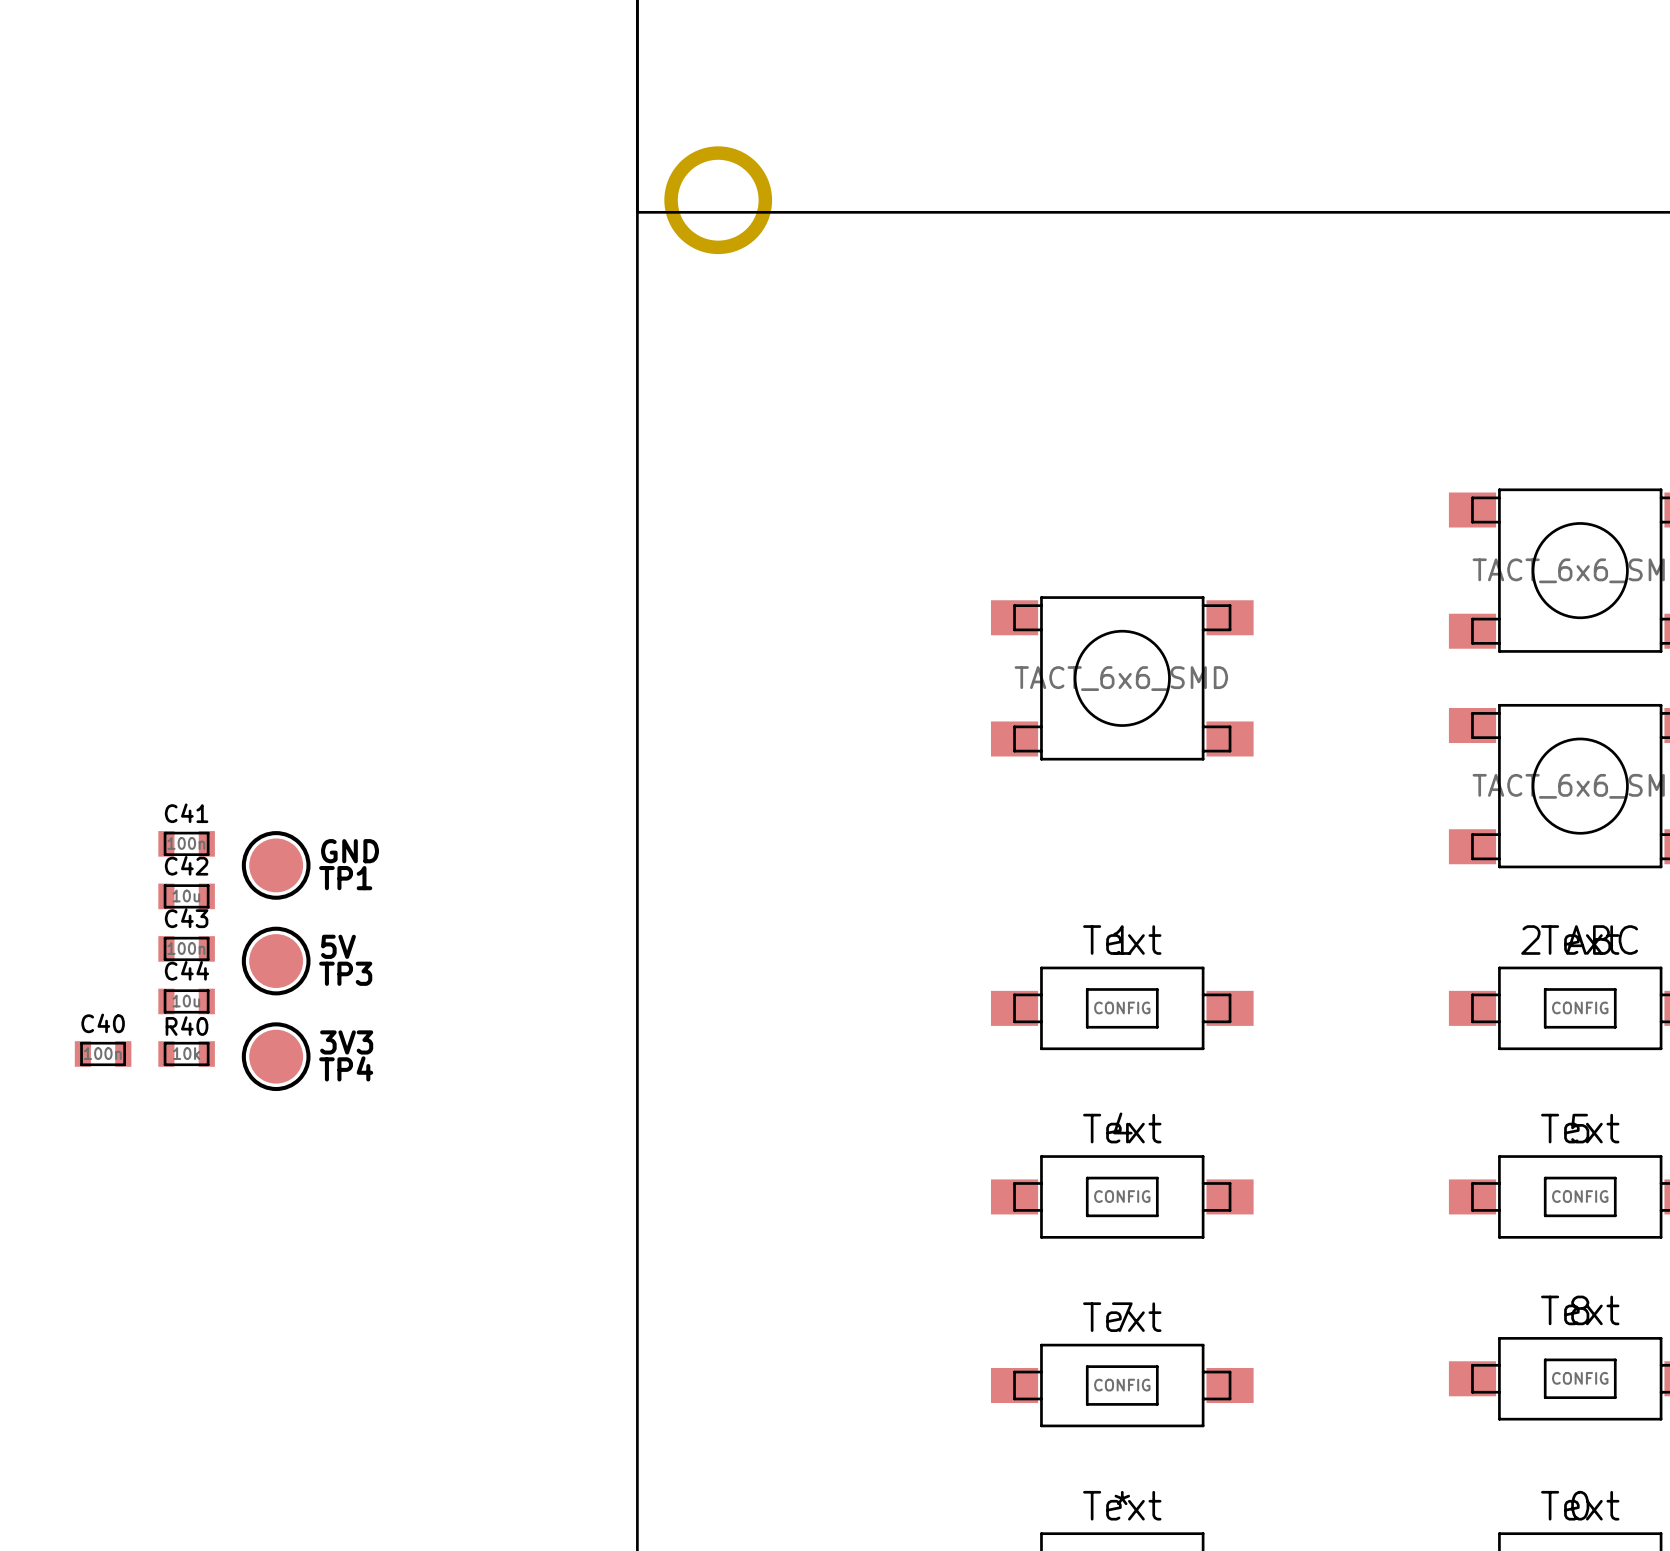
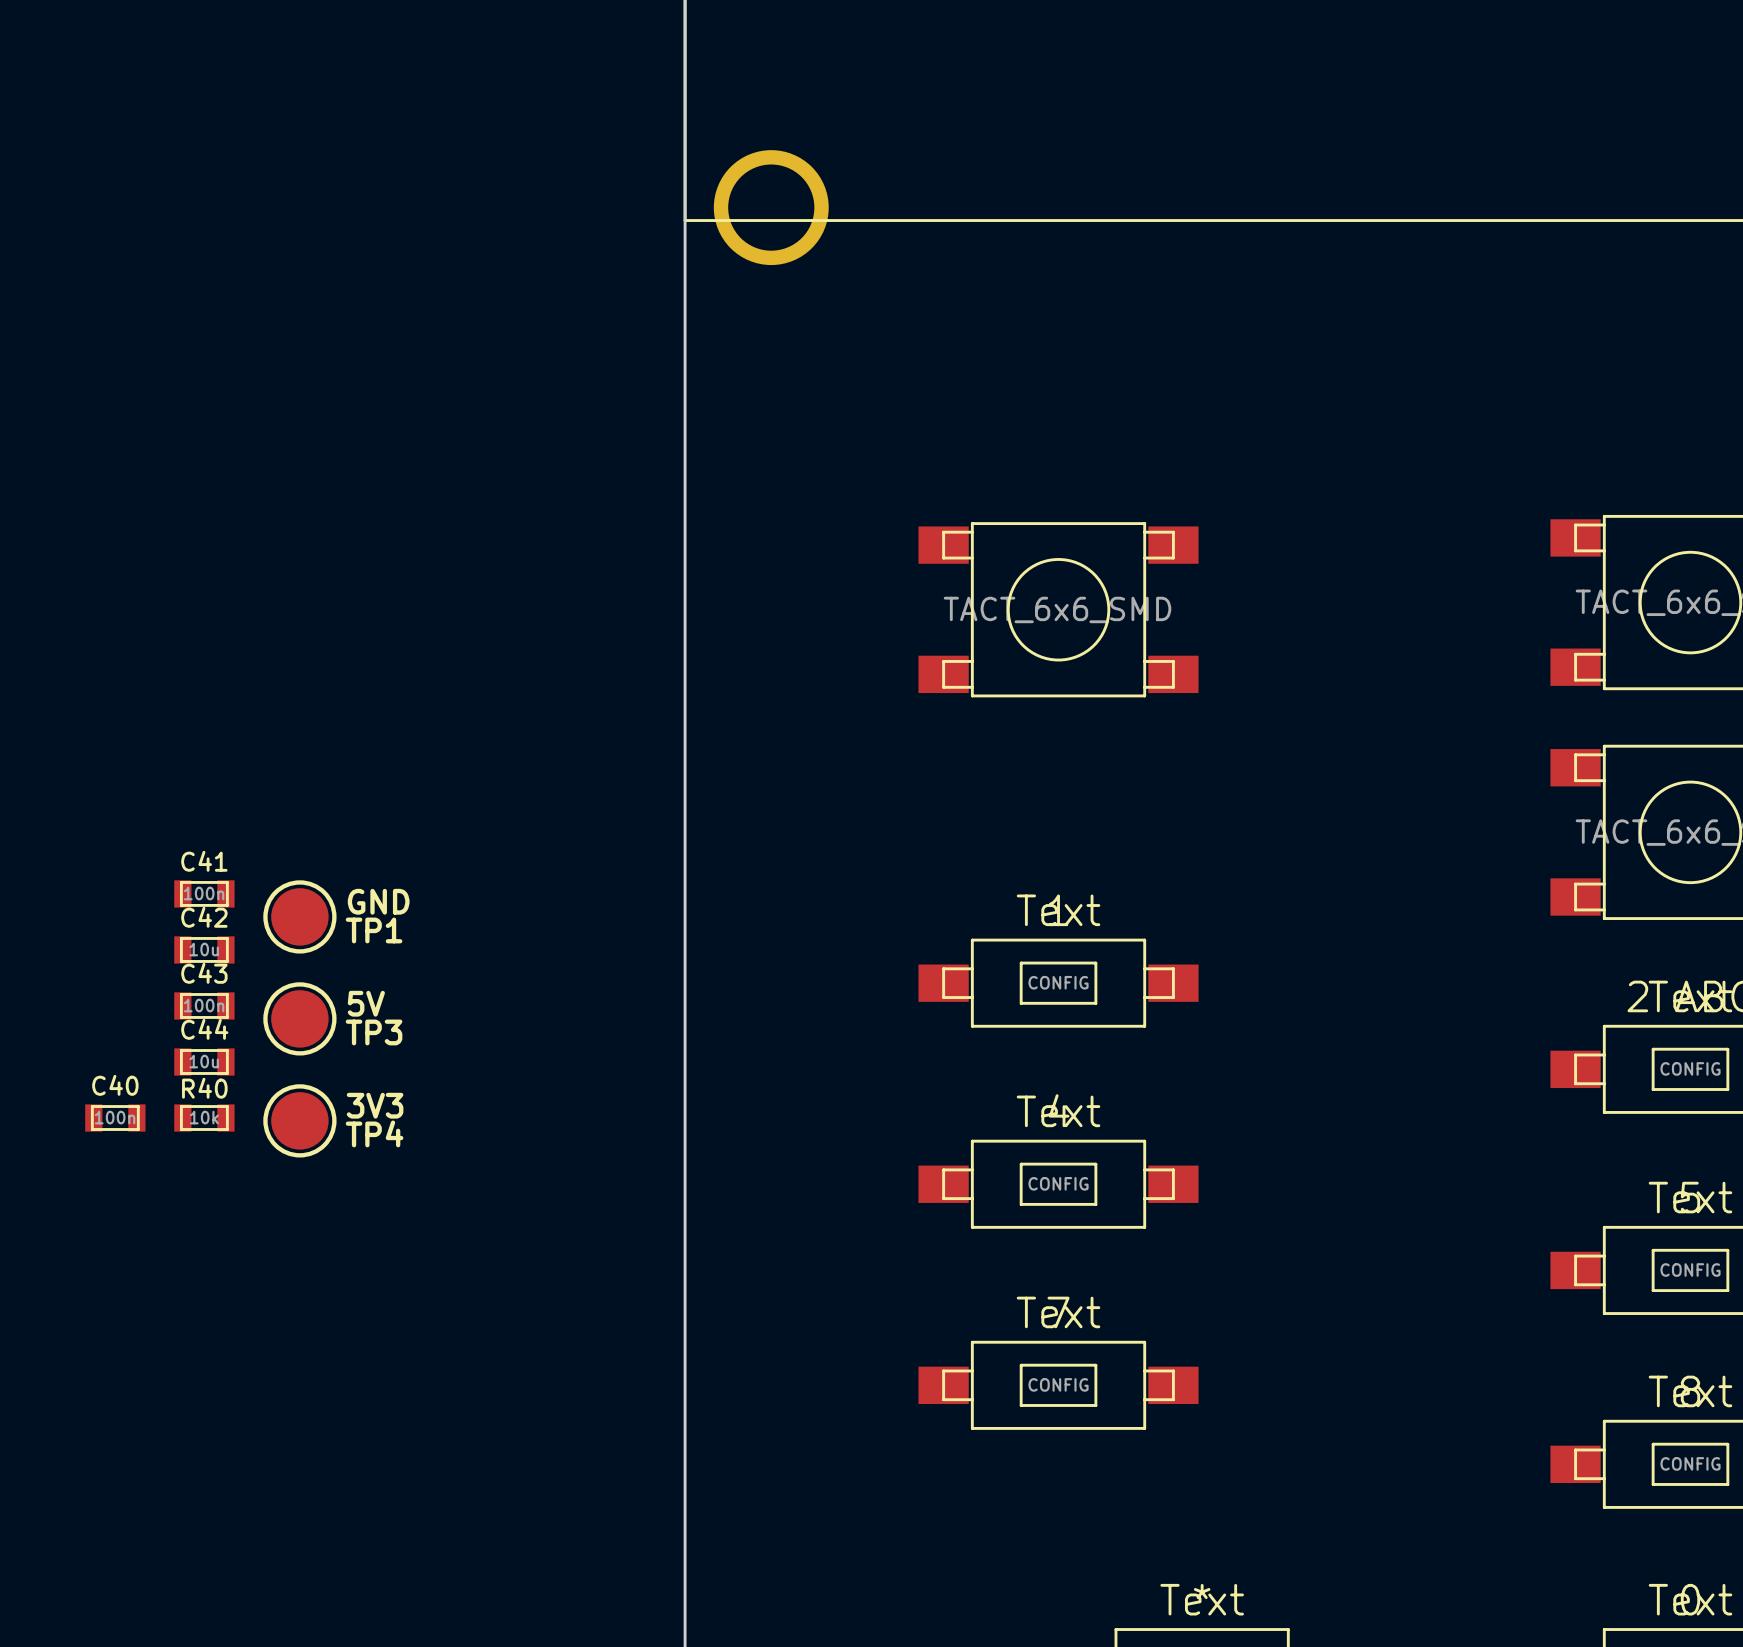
part position: (1122, 678) -> (1058, 609)
part position: (1122, 1008) -> (1058, 983)
part position: (1122, 1196) -> (1058, 1184)
part position: (1122, 1385) -> (1058, 1385)

